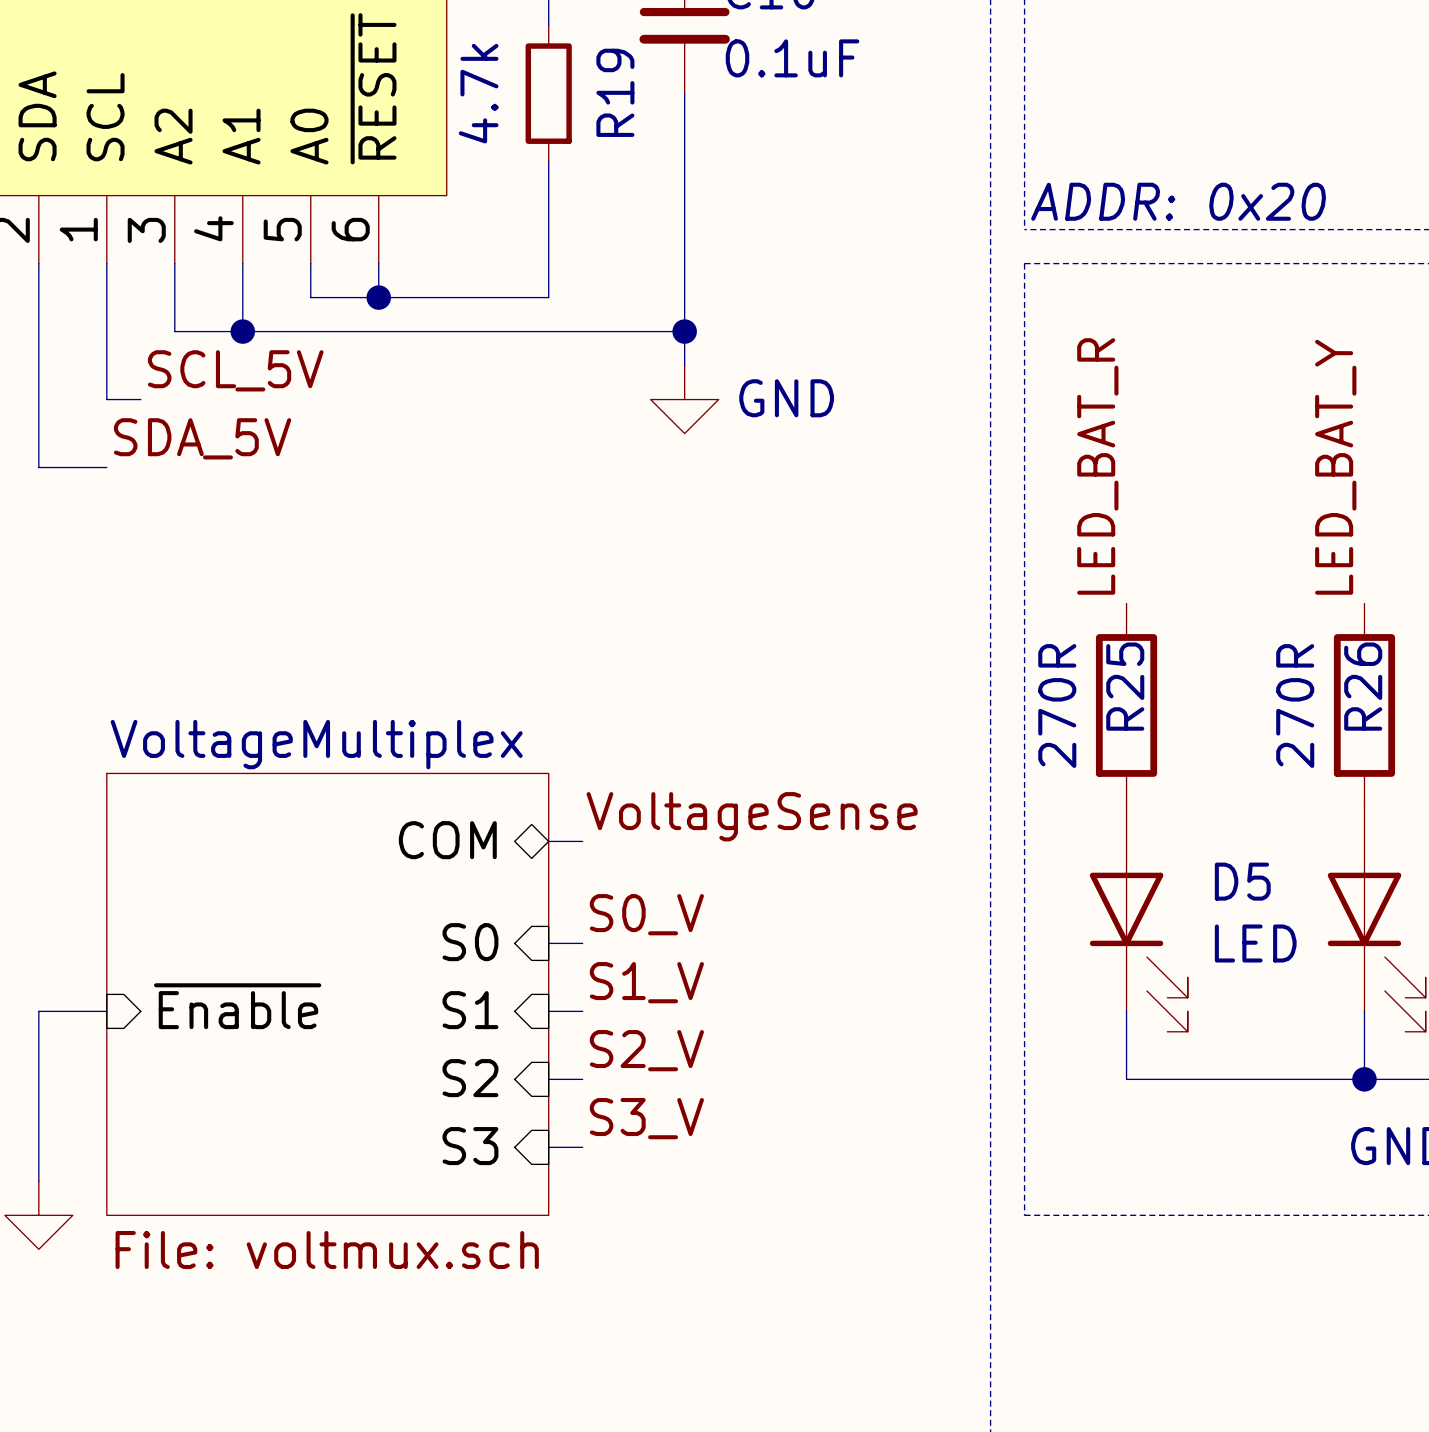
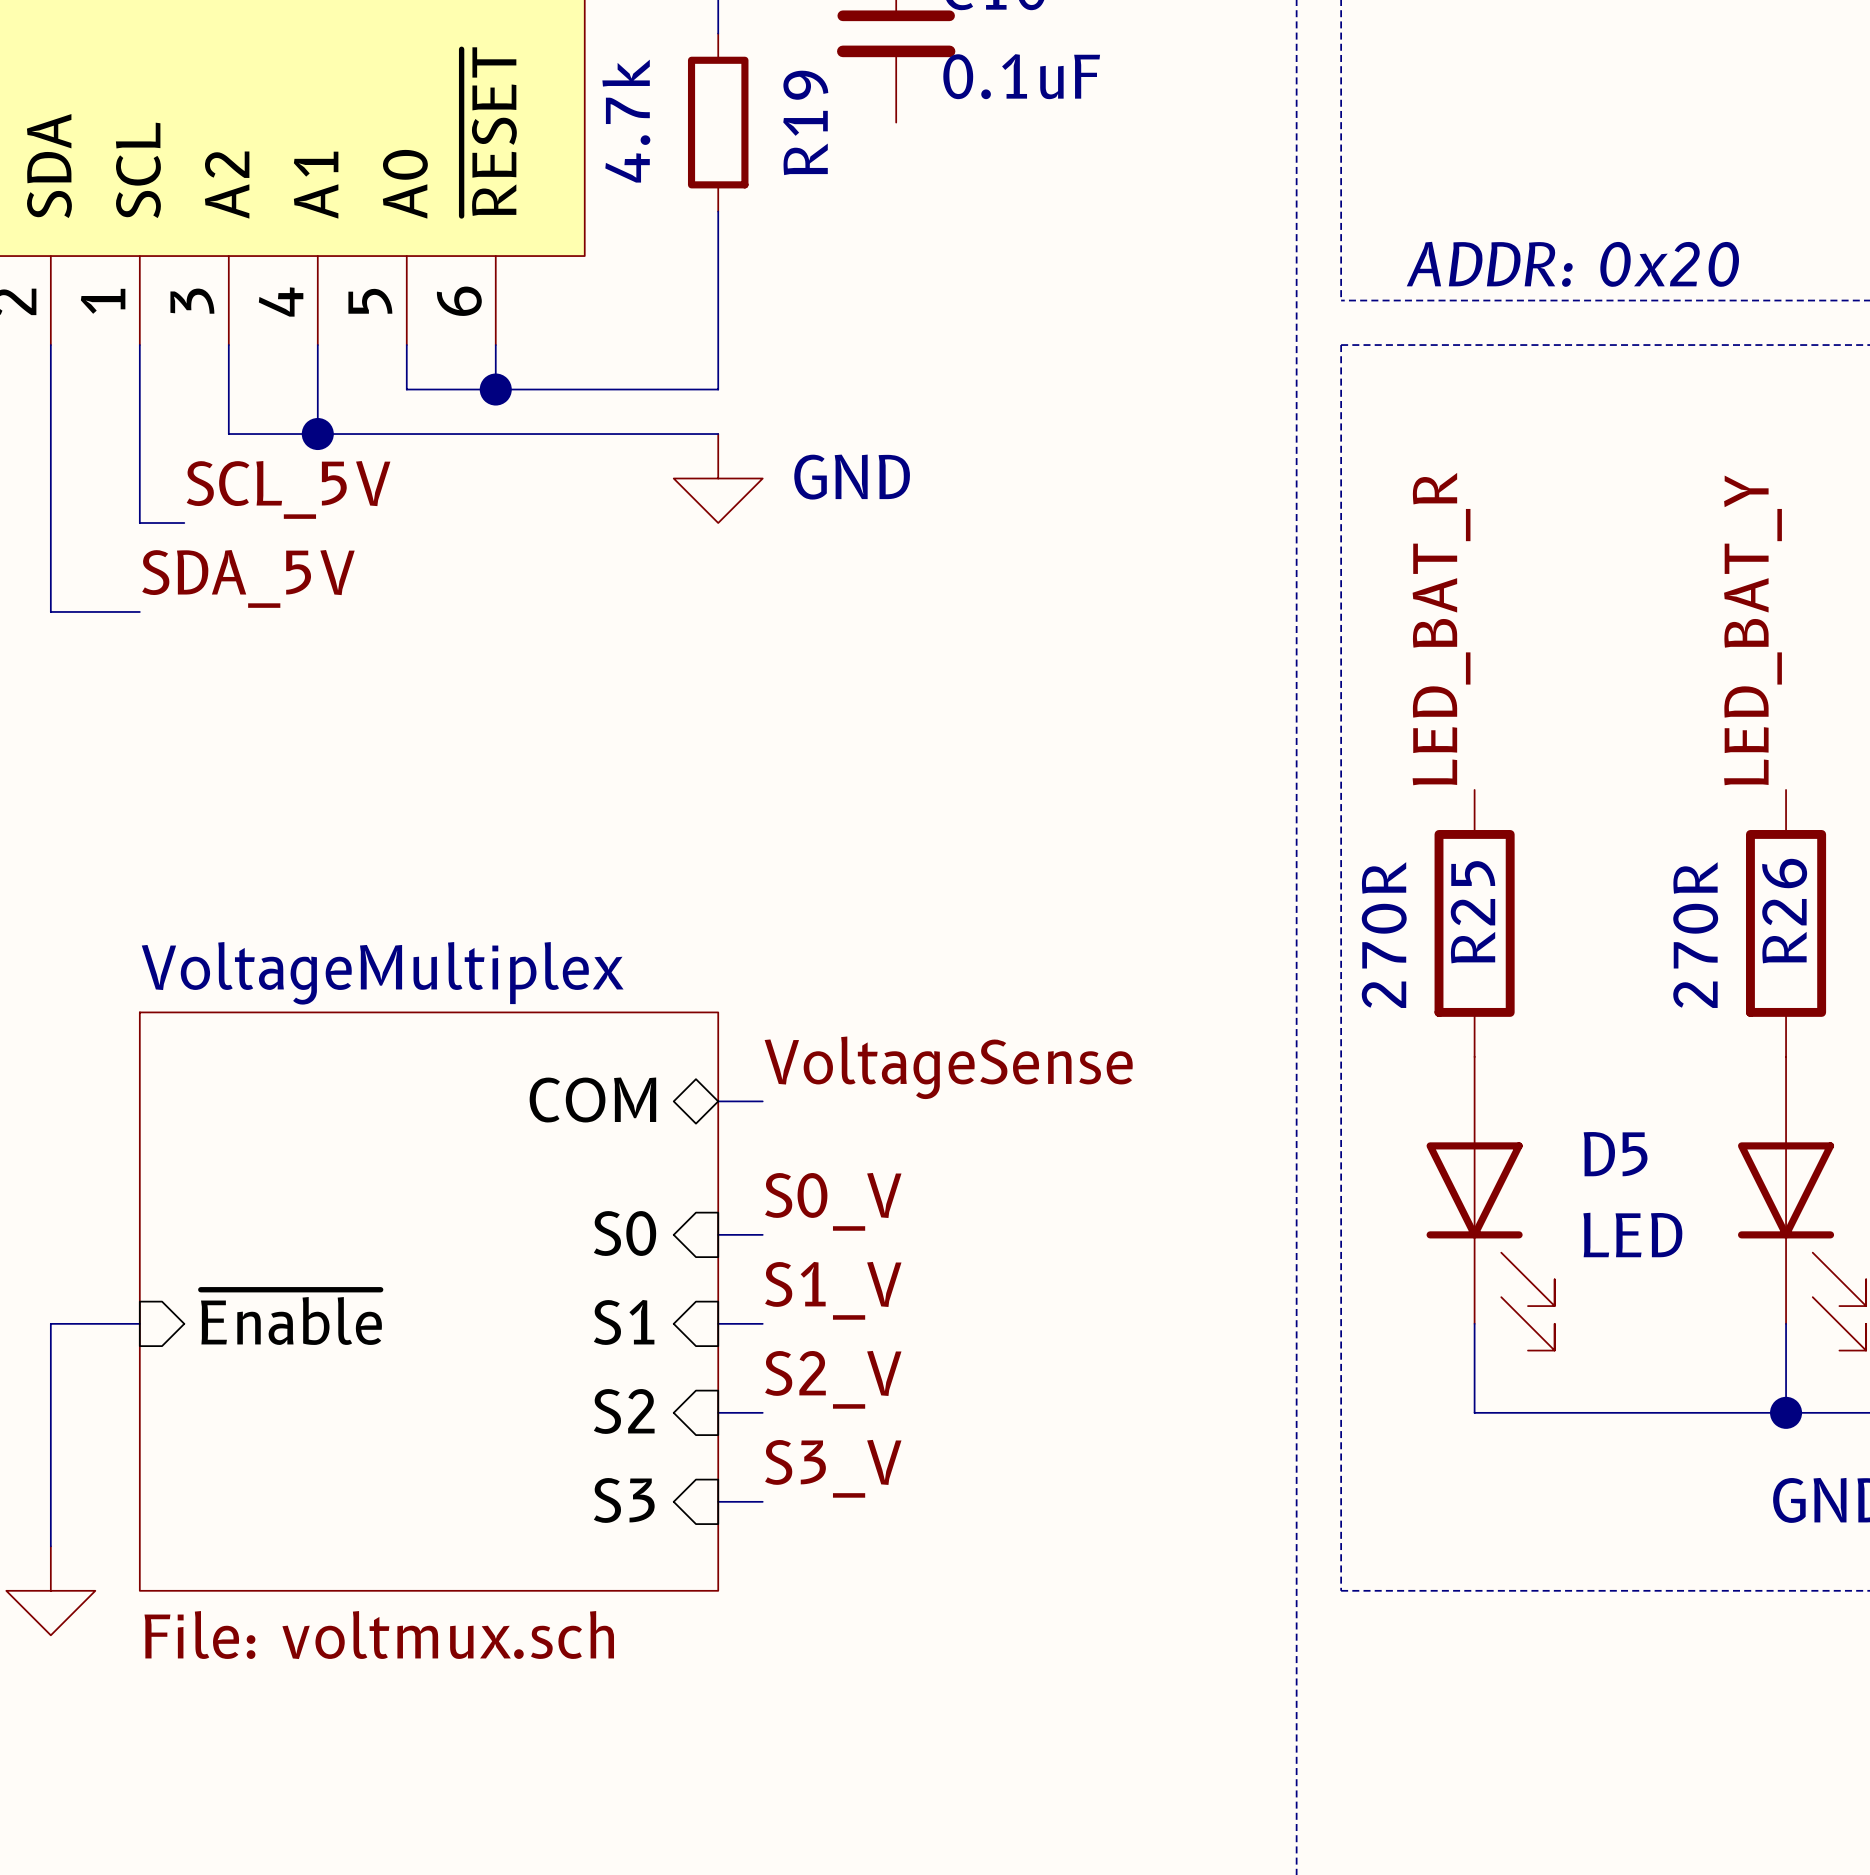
wire: (684, 93) (684, 365) -> none
wire: (548, 331) (684, 331) -> none
junction: (684, 331) -> none
power symbol position: GND (684, 399) -> GND (718, 478)

